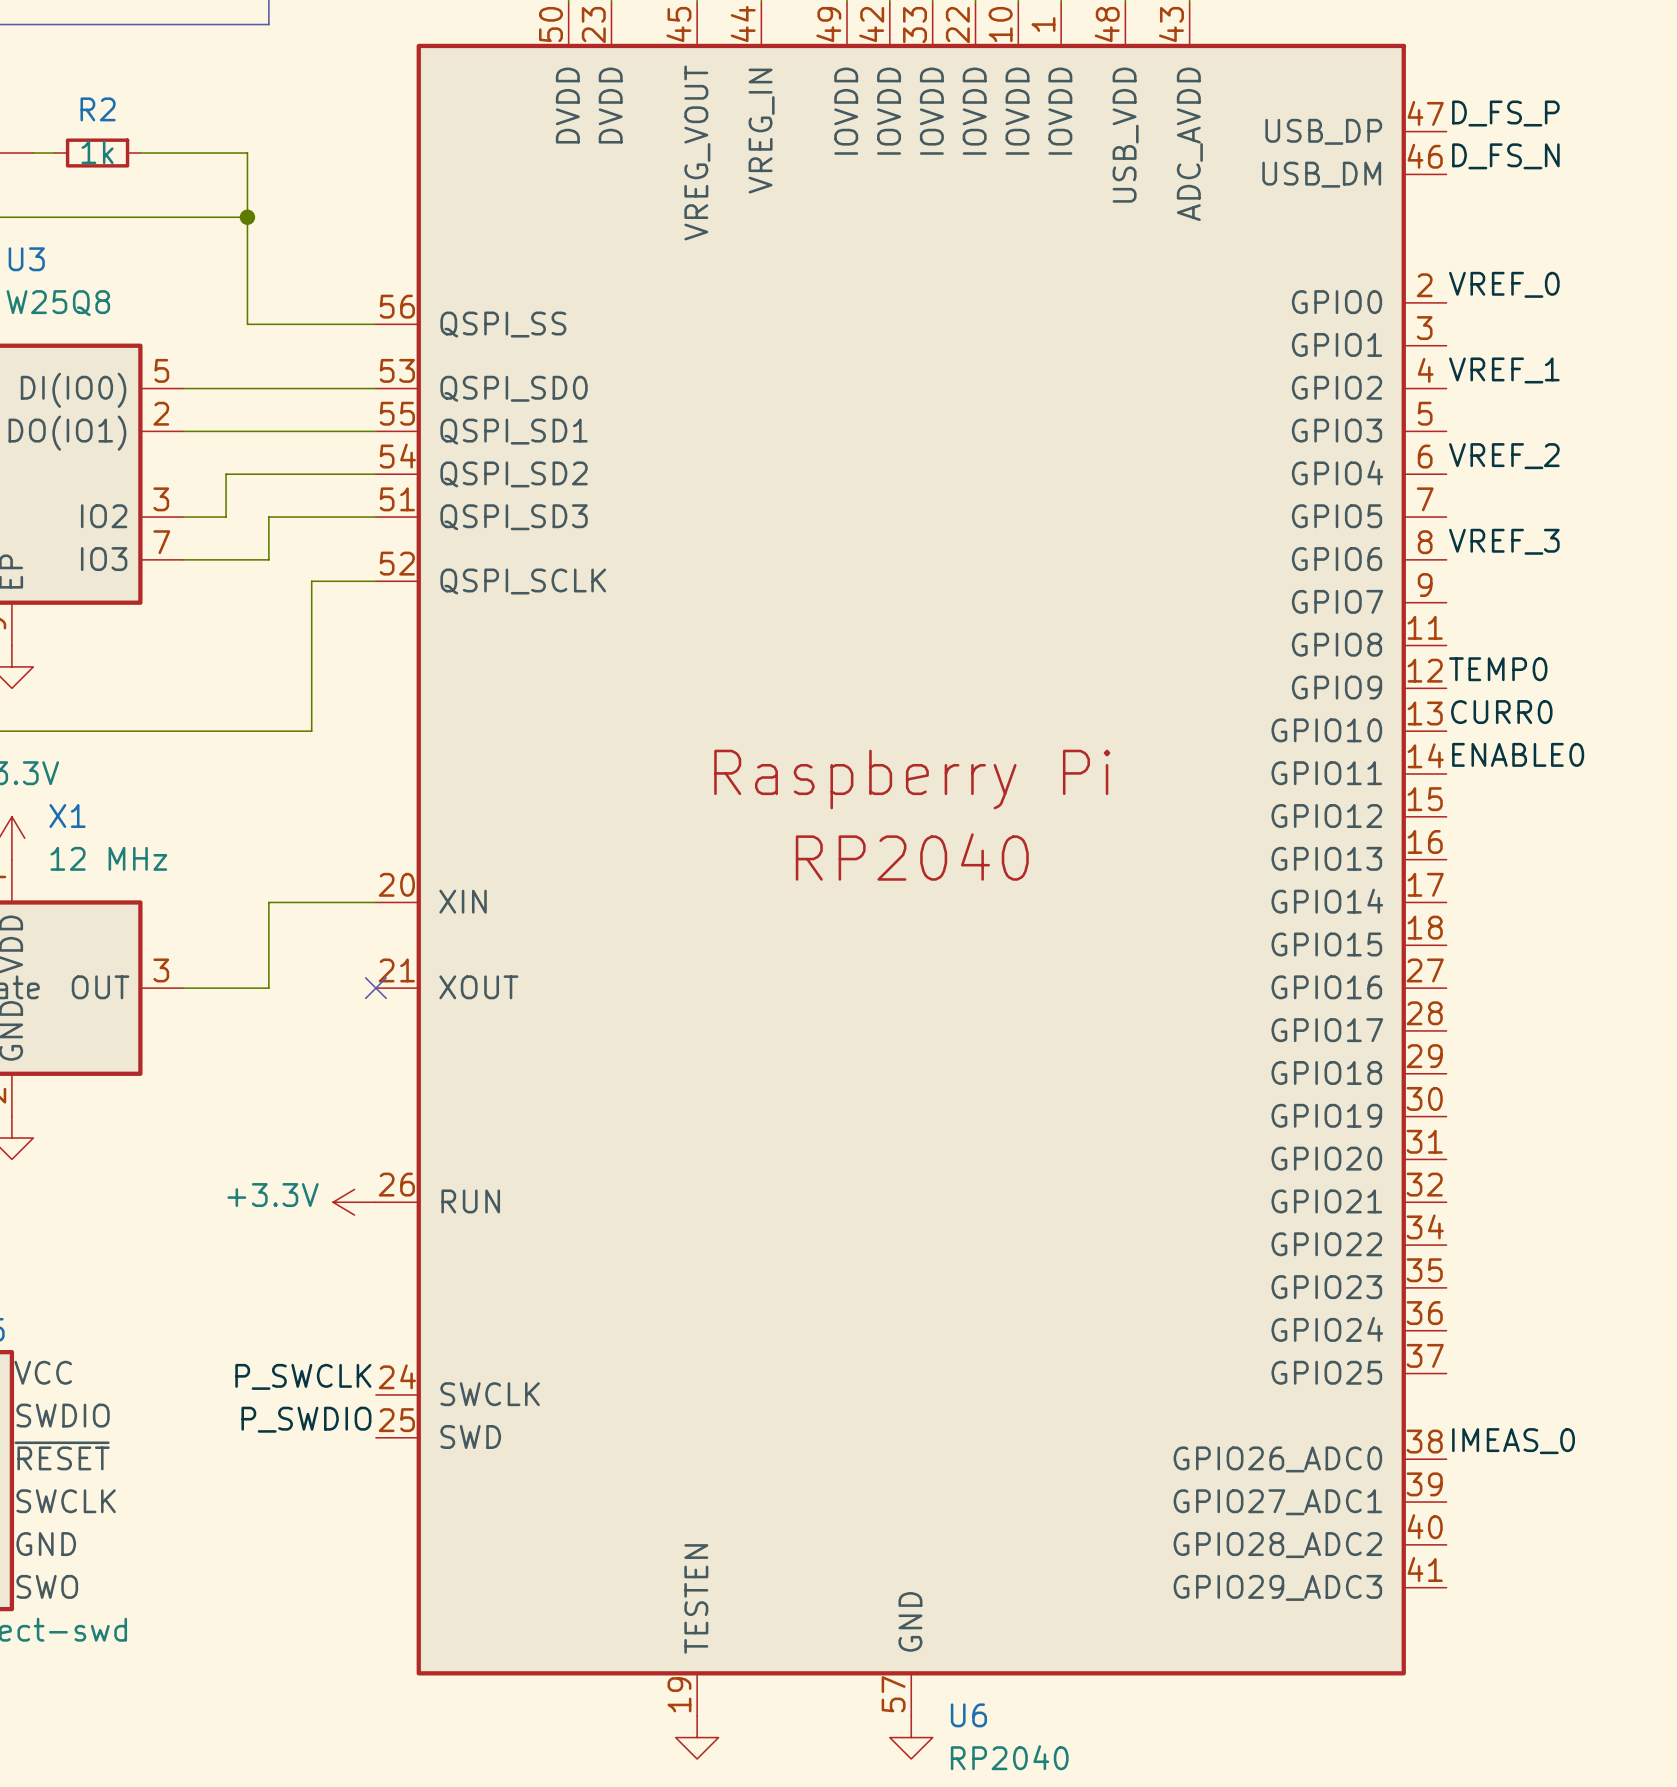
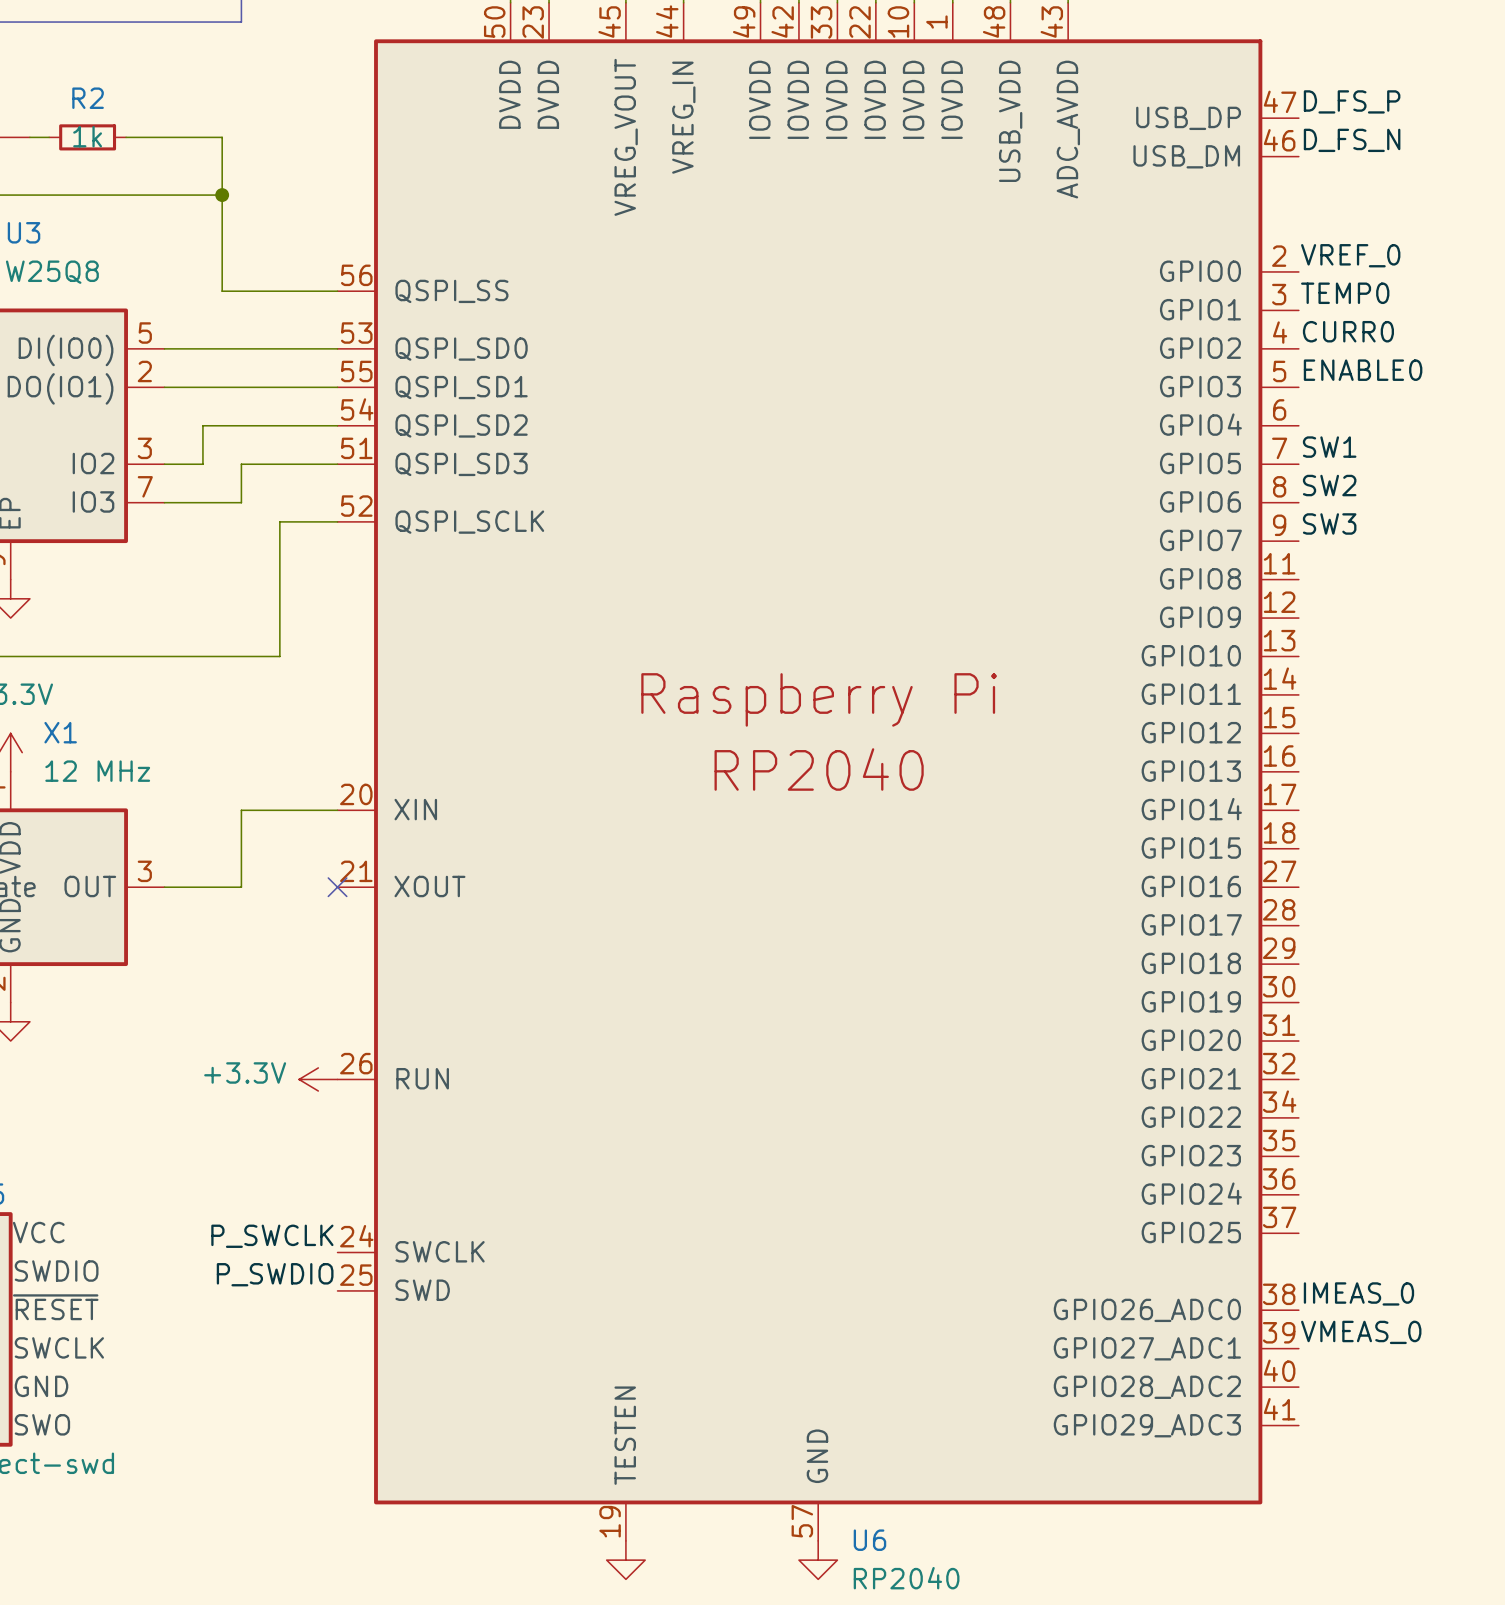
label: VREF_1 (1504, 370) -> CURR0 (1348, 331)
label: VREF_2 (1504, 456) -> none
label: none -> SW1 (1329, 447)
label: VREF_3 (1504, 541) -> SW2 (1329, 485)
label: none -> SW3 (1329, 523)
label position: TEMP0 (1498, 669) -> TEMP0 (1345, 293)
label: CURR0 (1501, 712) -> none
label position: ENABLE0 (1518, 754) -> ENABLE0 (1363, 370)
label: none -> VMEAS_0 (1361, 1332)

